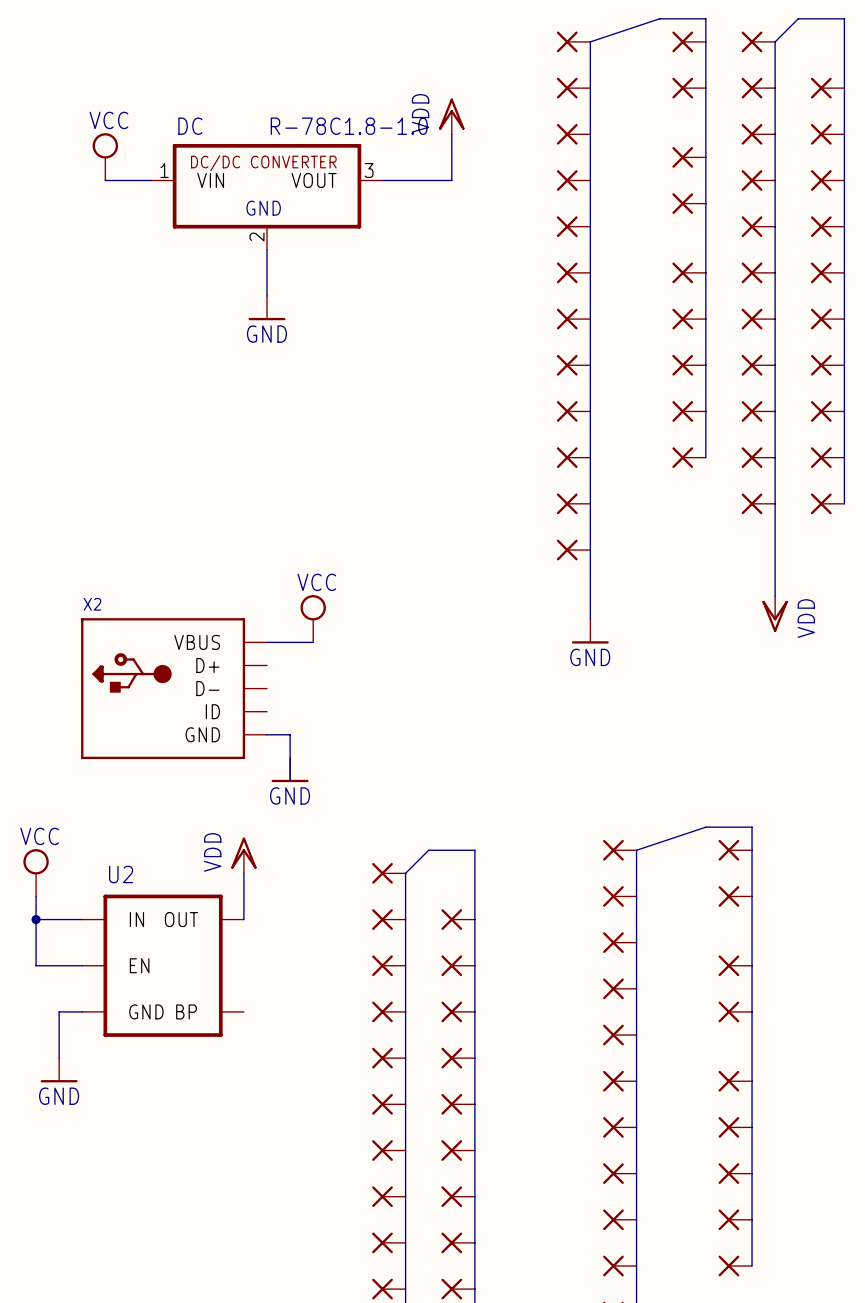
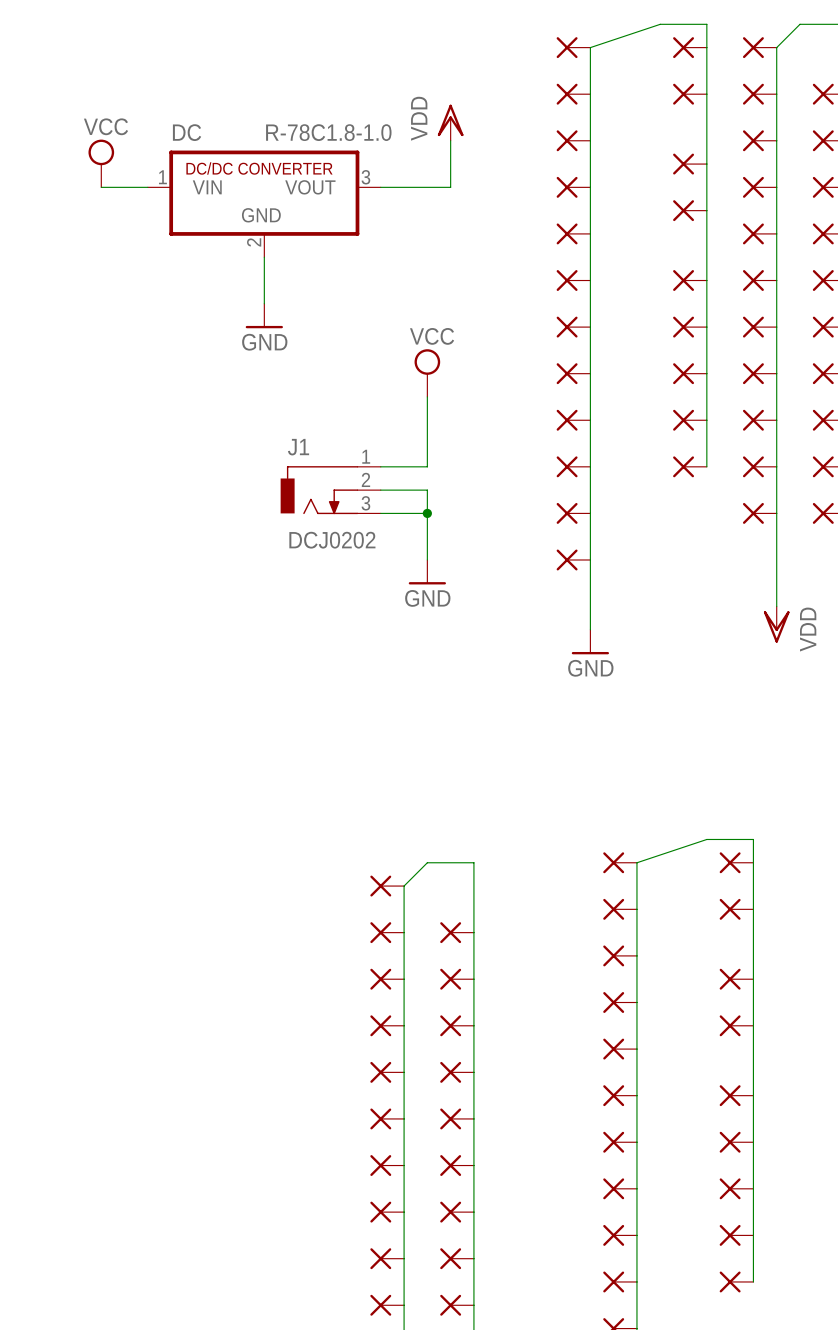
power symbol: none -> VCC (427, 373)
wire: none -> (427, 396) (427, 466) (380, 466)
J1: none -> DCJ0202 (330, 490)
wire: none -> (380, 490) (427, 490) (427, 559)
junction: none -> (427, 513)
power symbol: none -> GND (427, 572)
power symbol: VCC (313, 618) -> none
wire: (267, 642) (313, 642) -> (380, 513) (427, 513)
X2: (173, 688) -> none
wire: (267, 734) (290, 734) (290, 780) -> none
power symbol: GND (290, 770) -> none
power symbol: VDD (243, 855) -> none
power symbol: VCC (36, 872) -> none
wire: (243, 873) (243, 919) -> none
wire: (36, 896) (36, 965) (82, 965) -> none
wire: (36, 919) (82, 919) -> none
junction: (36, 919) -> none
U2: (163, 965) -> none
wire: (82, 1011) (59, 1011) (59, 1058) -> none
power symbol: GND (59, 1070) -> none

